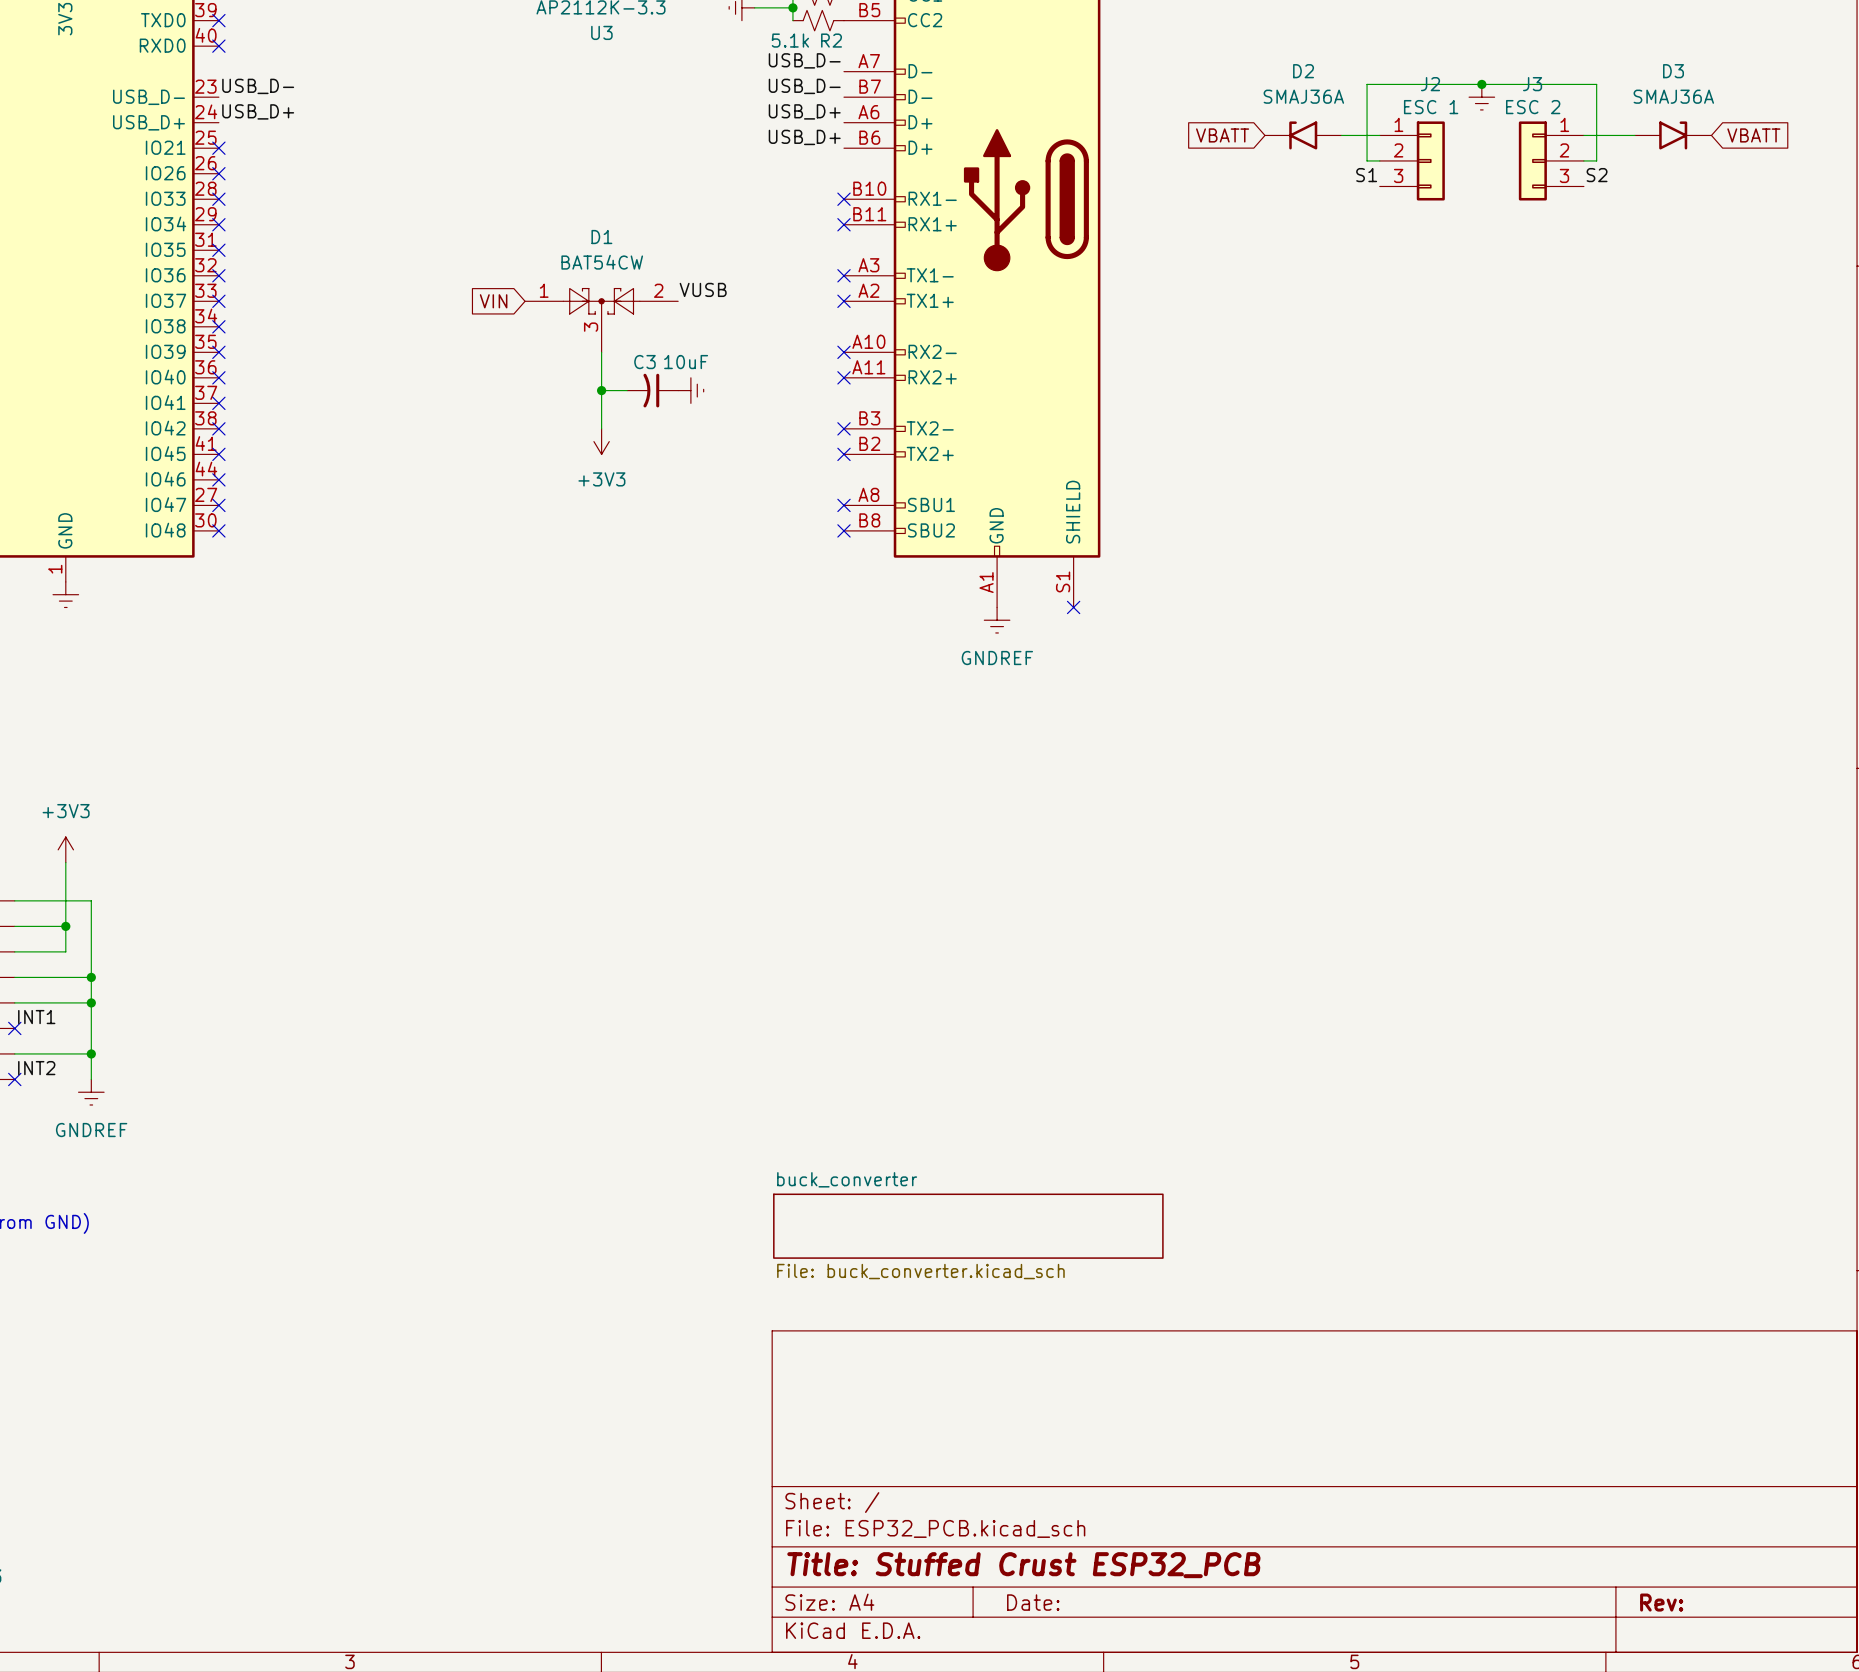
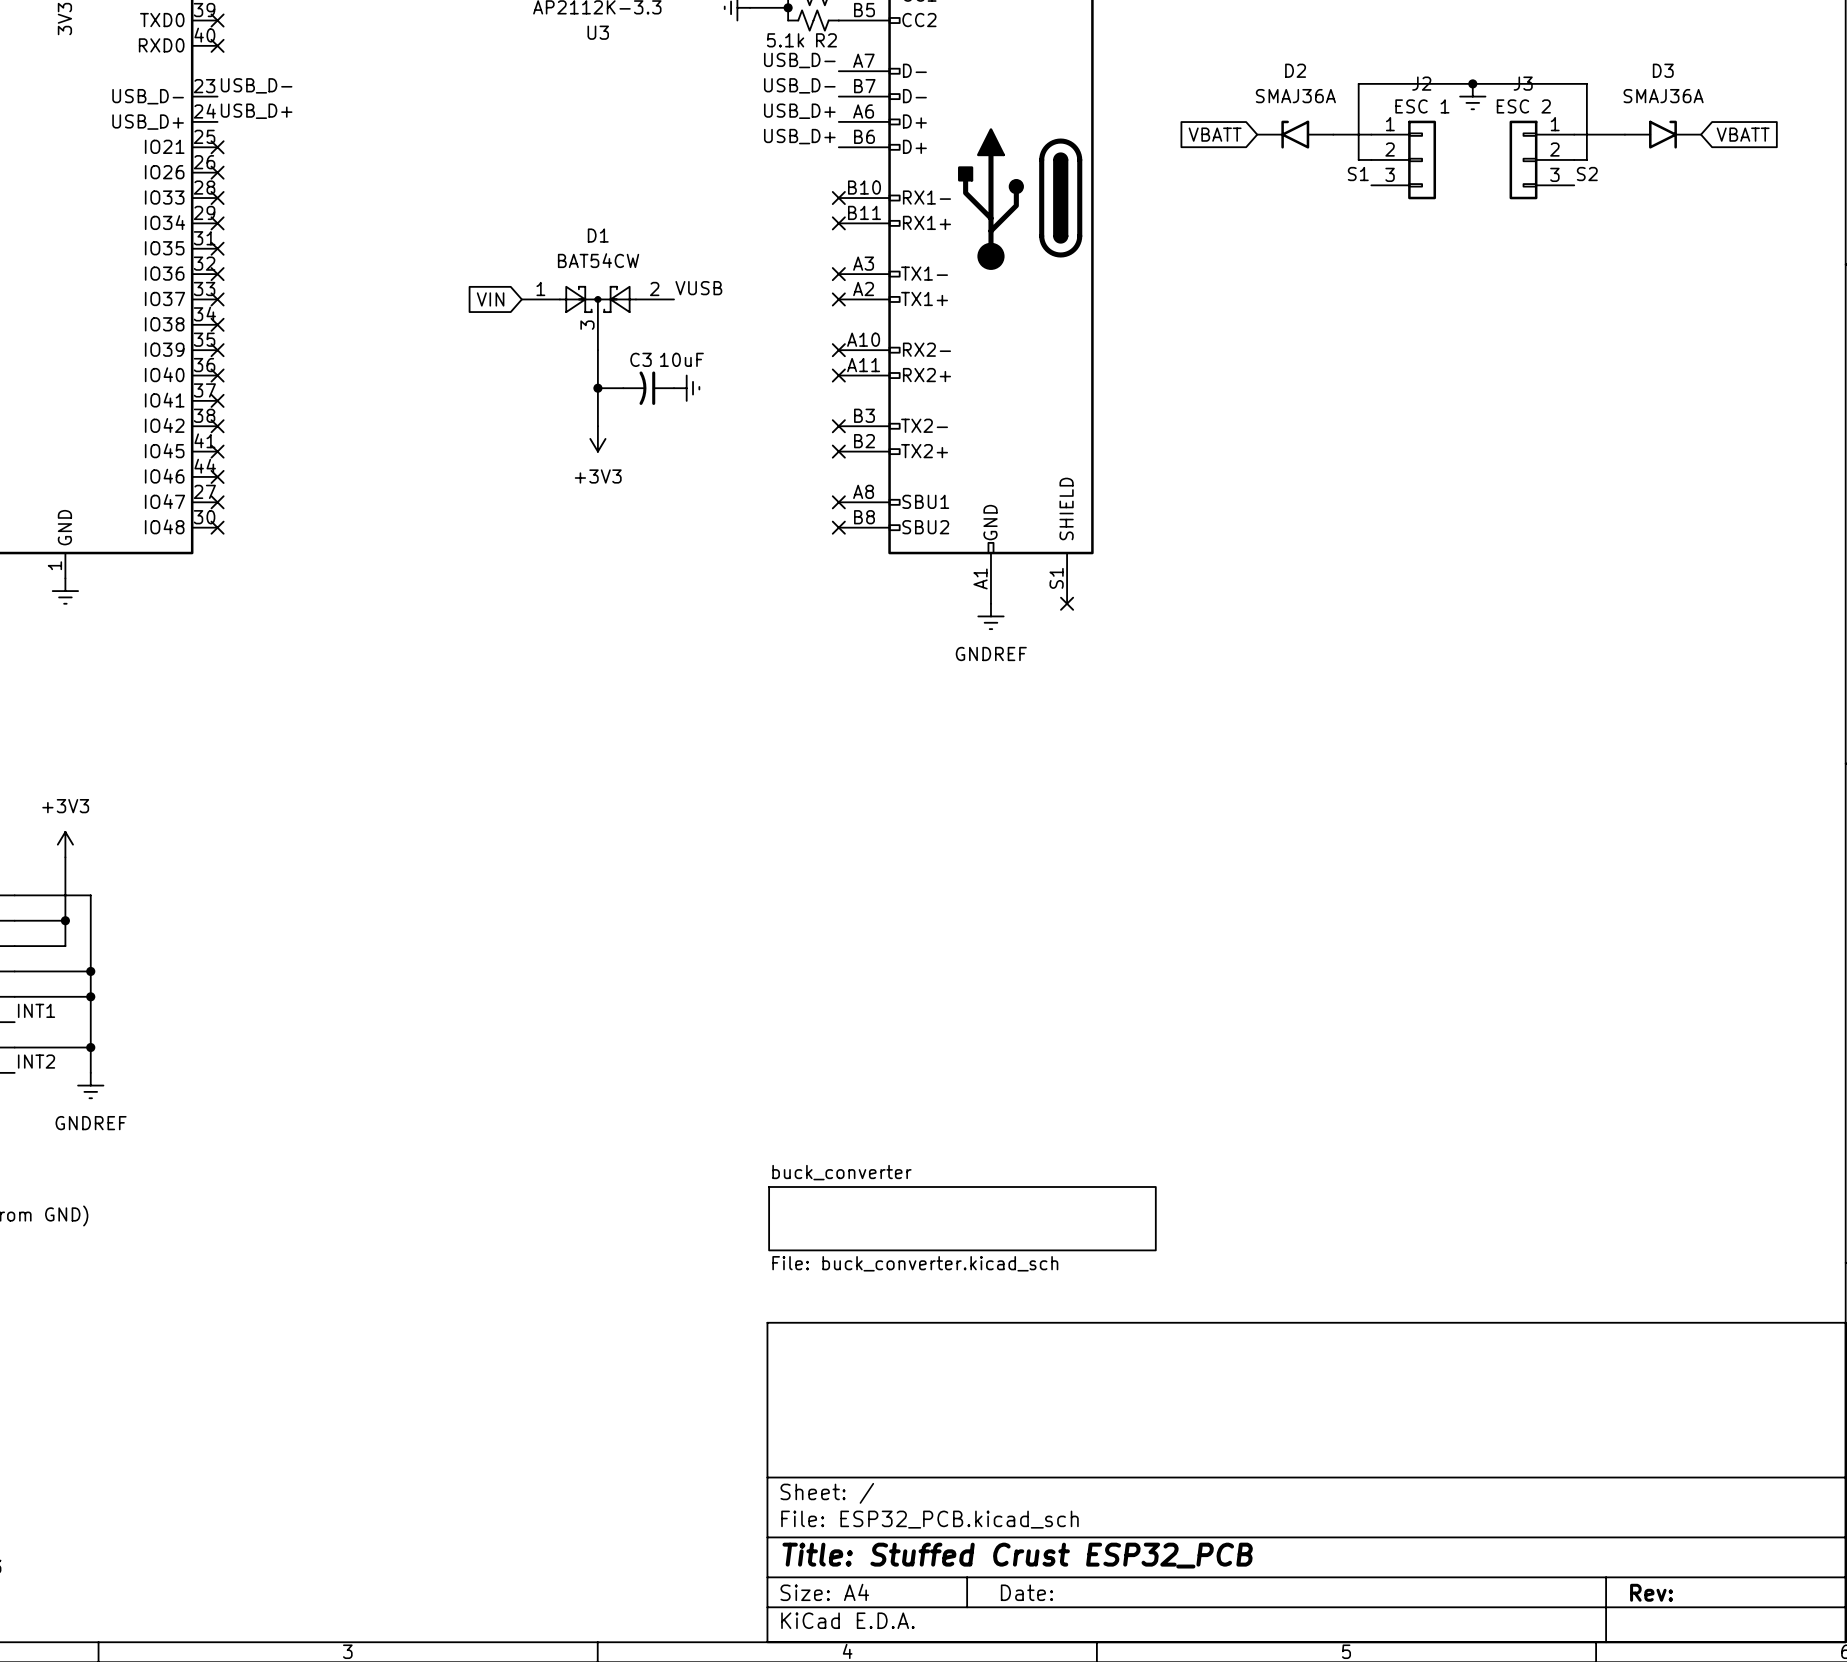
no-connect mark: (14, 1028) -> none
no-connect mark: (14, 1079) -> none

